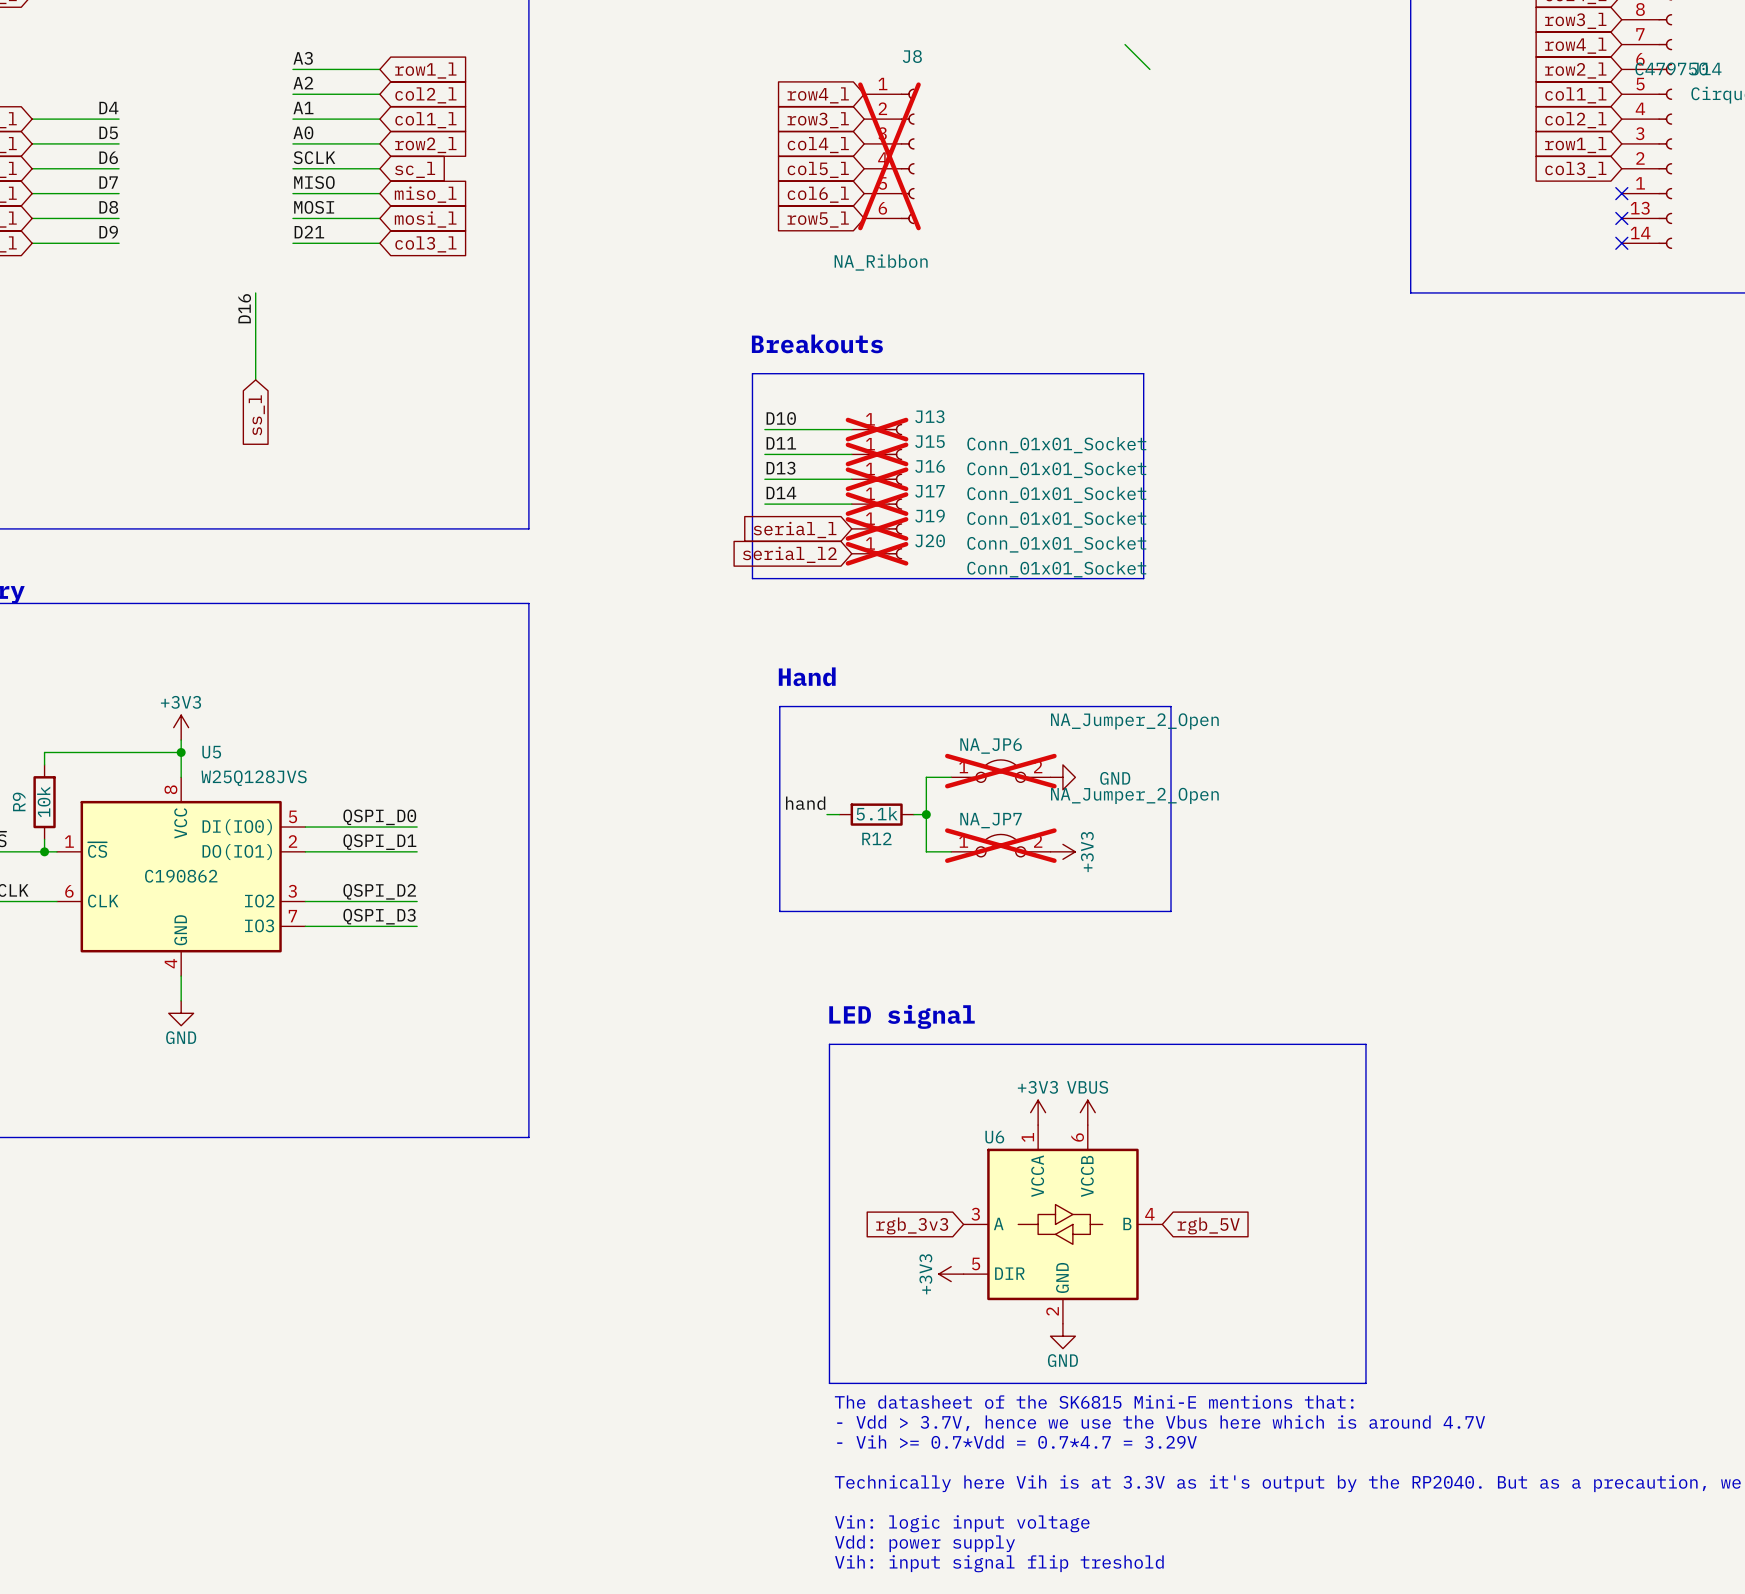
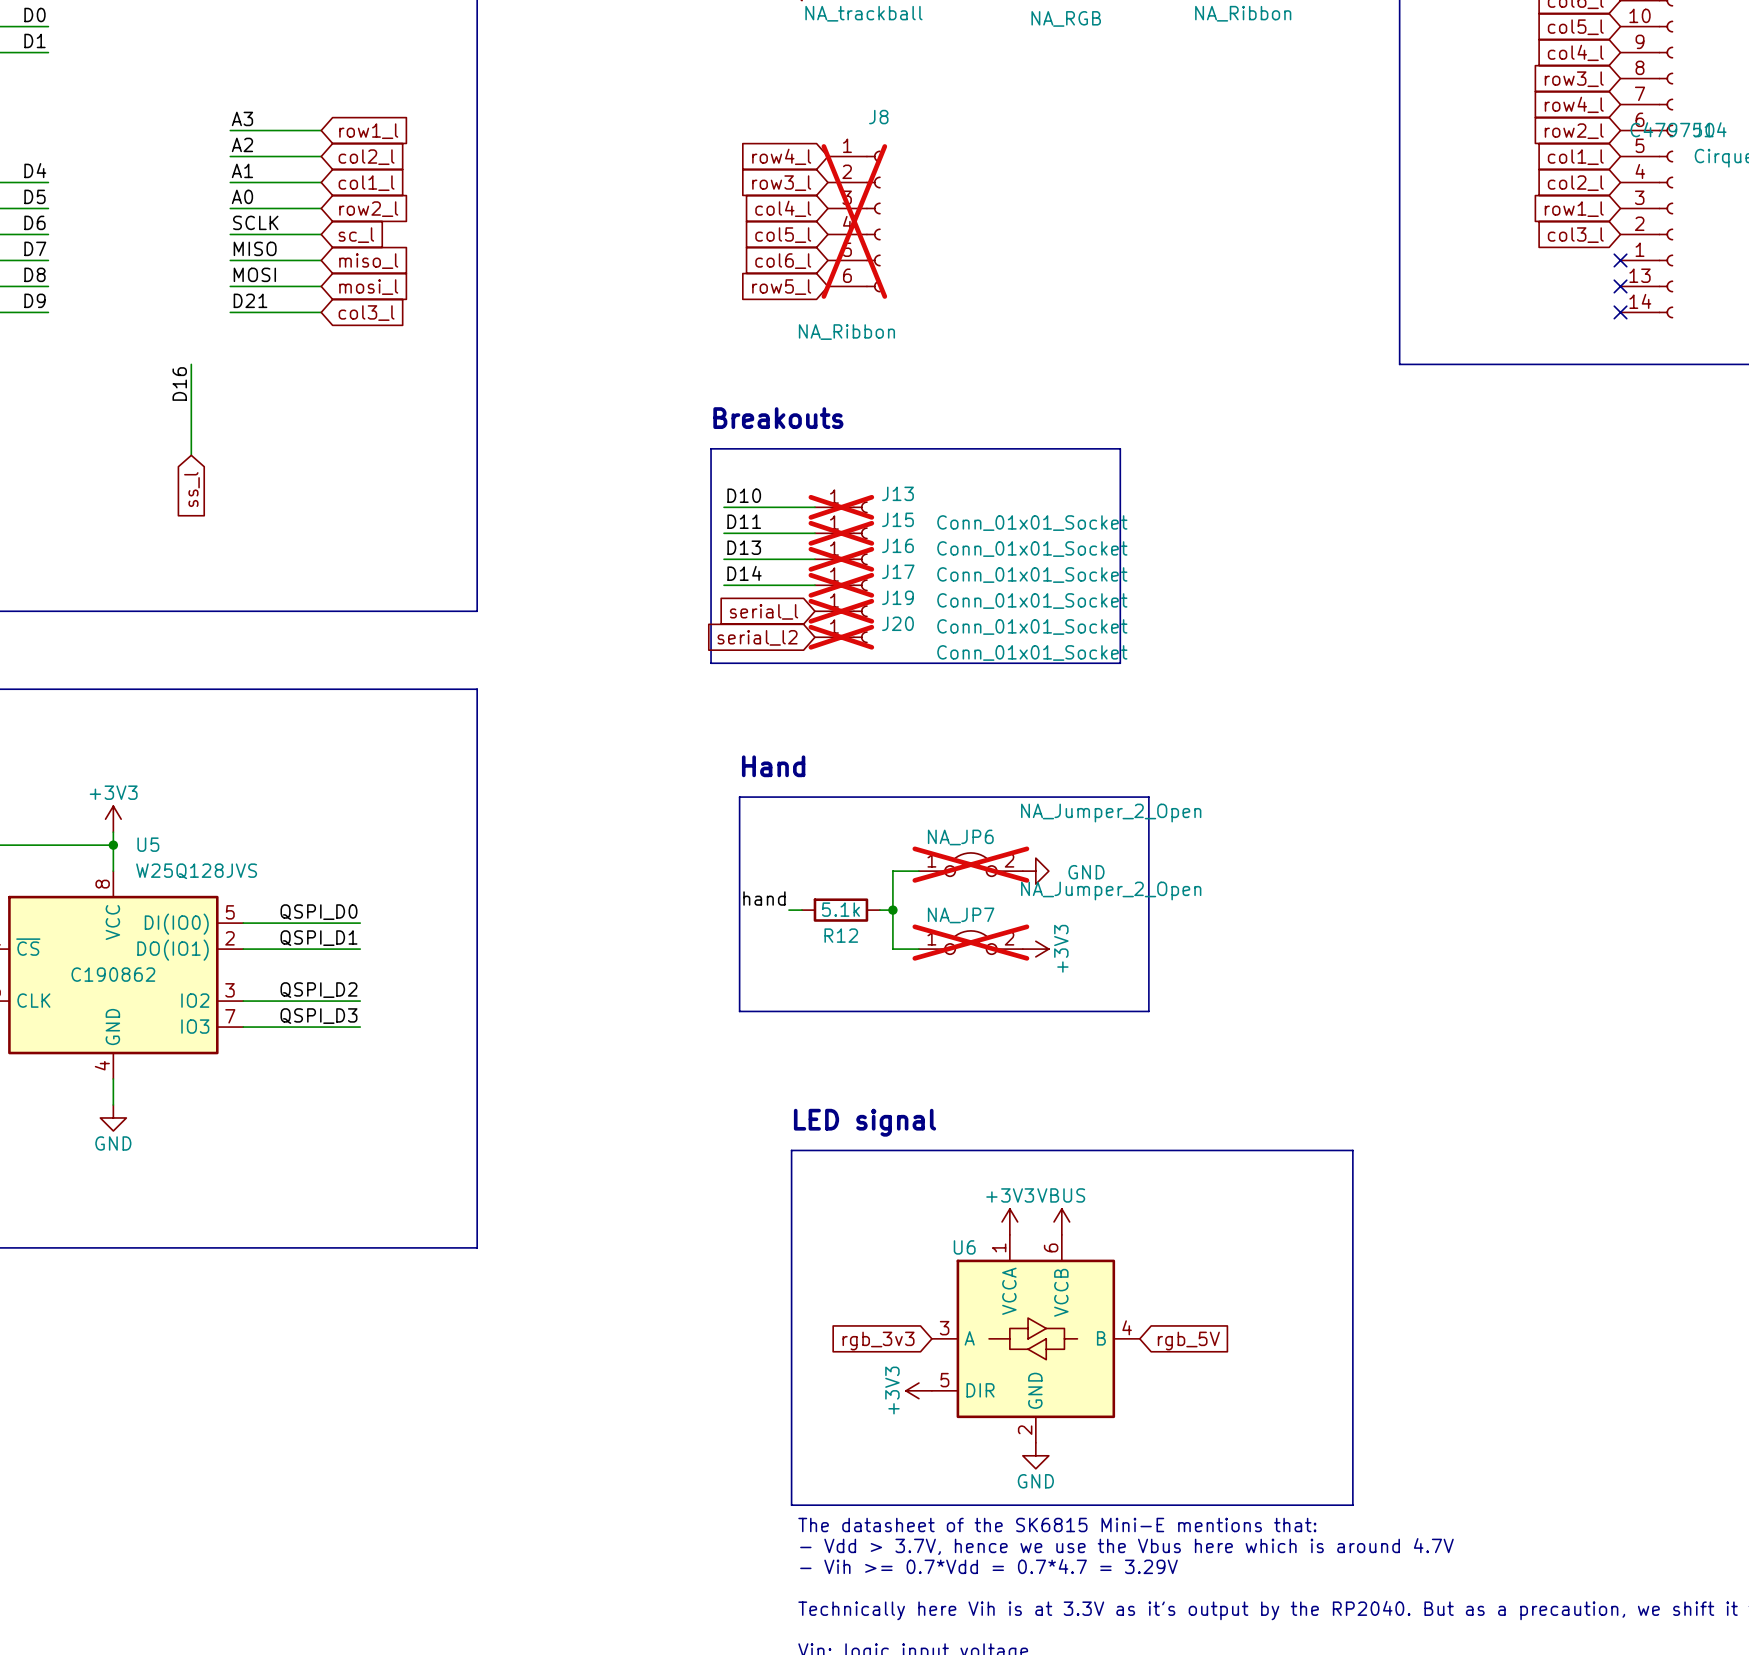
wire: (1125, 44) (1149, 69) -> none

